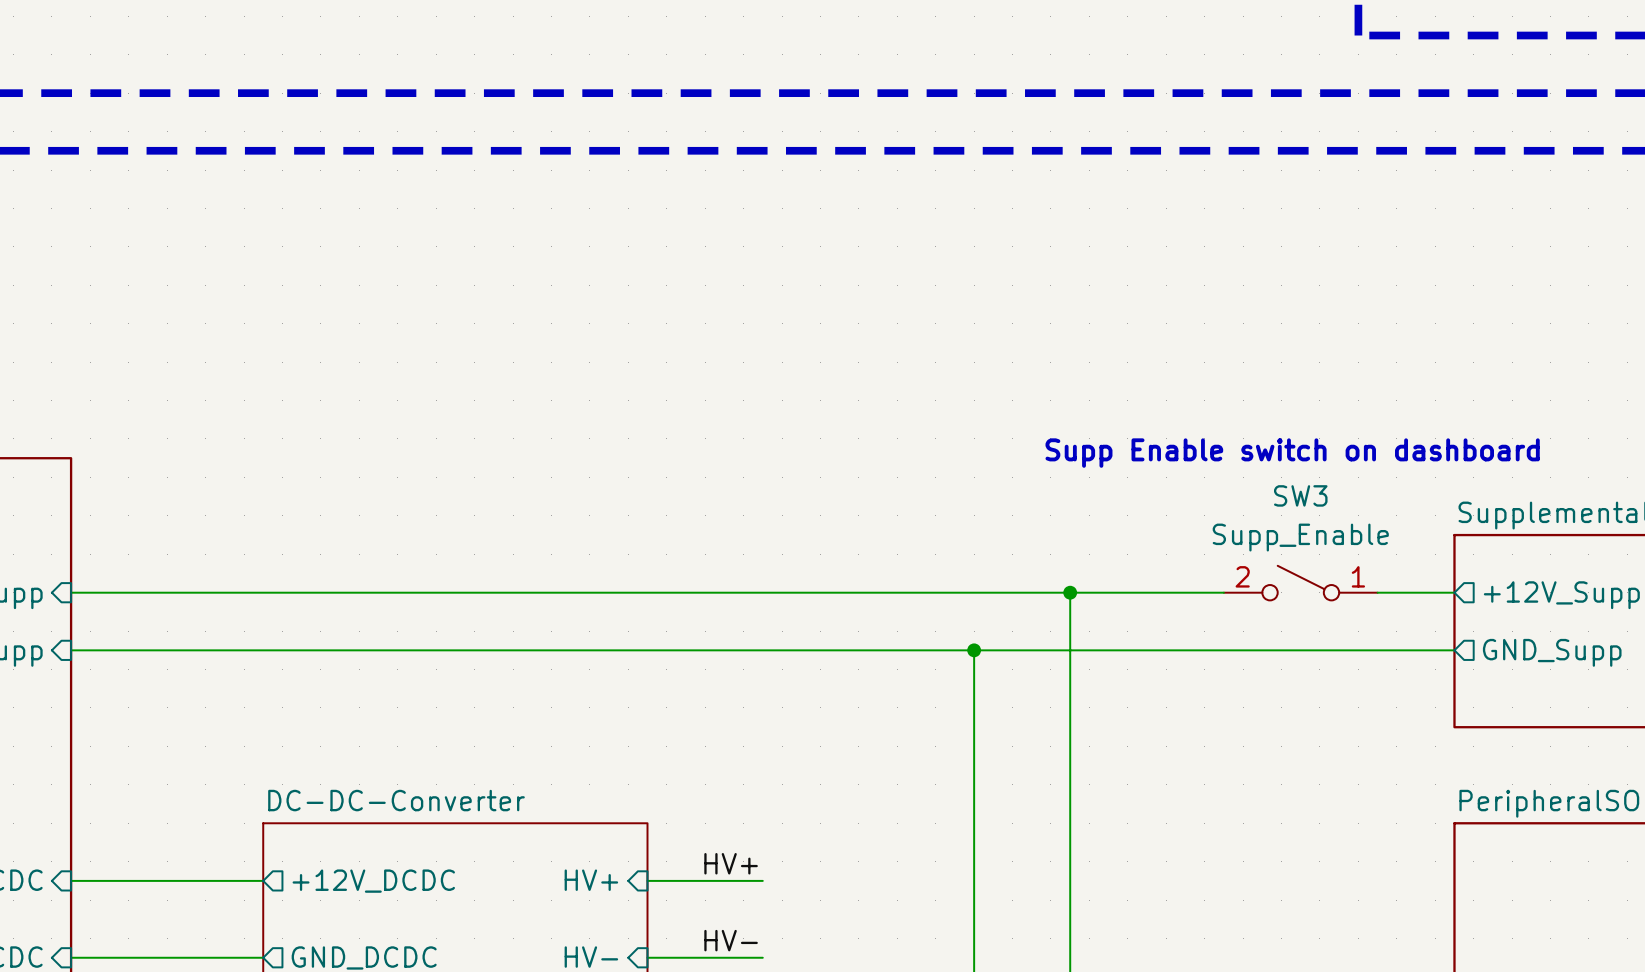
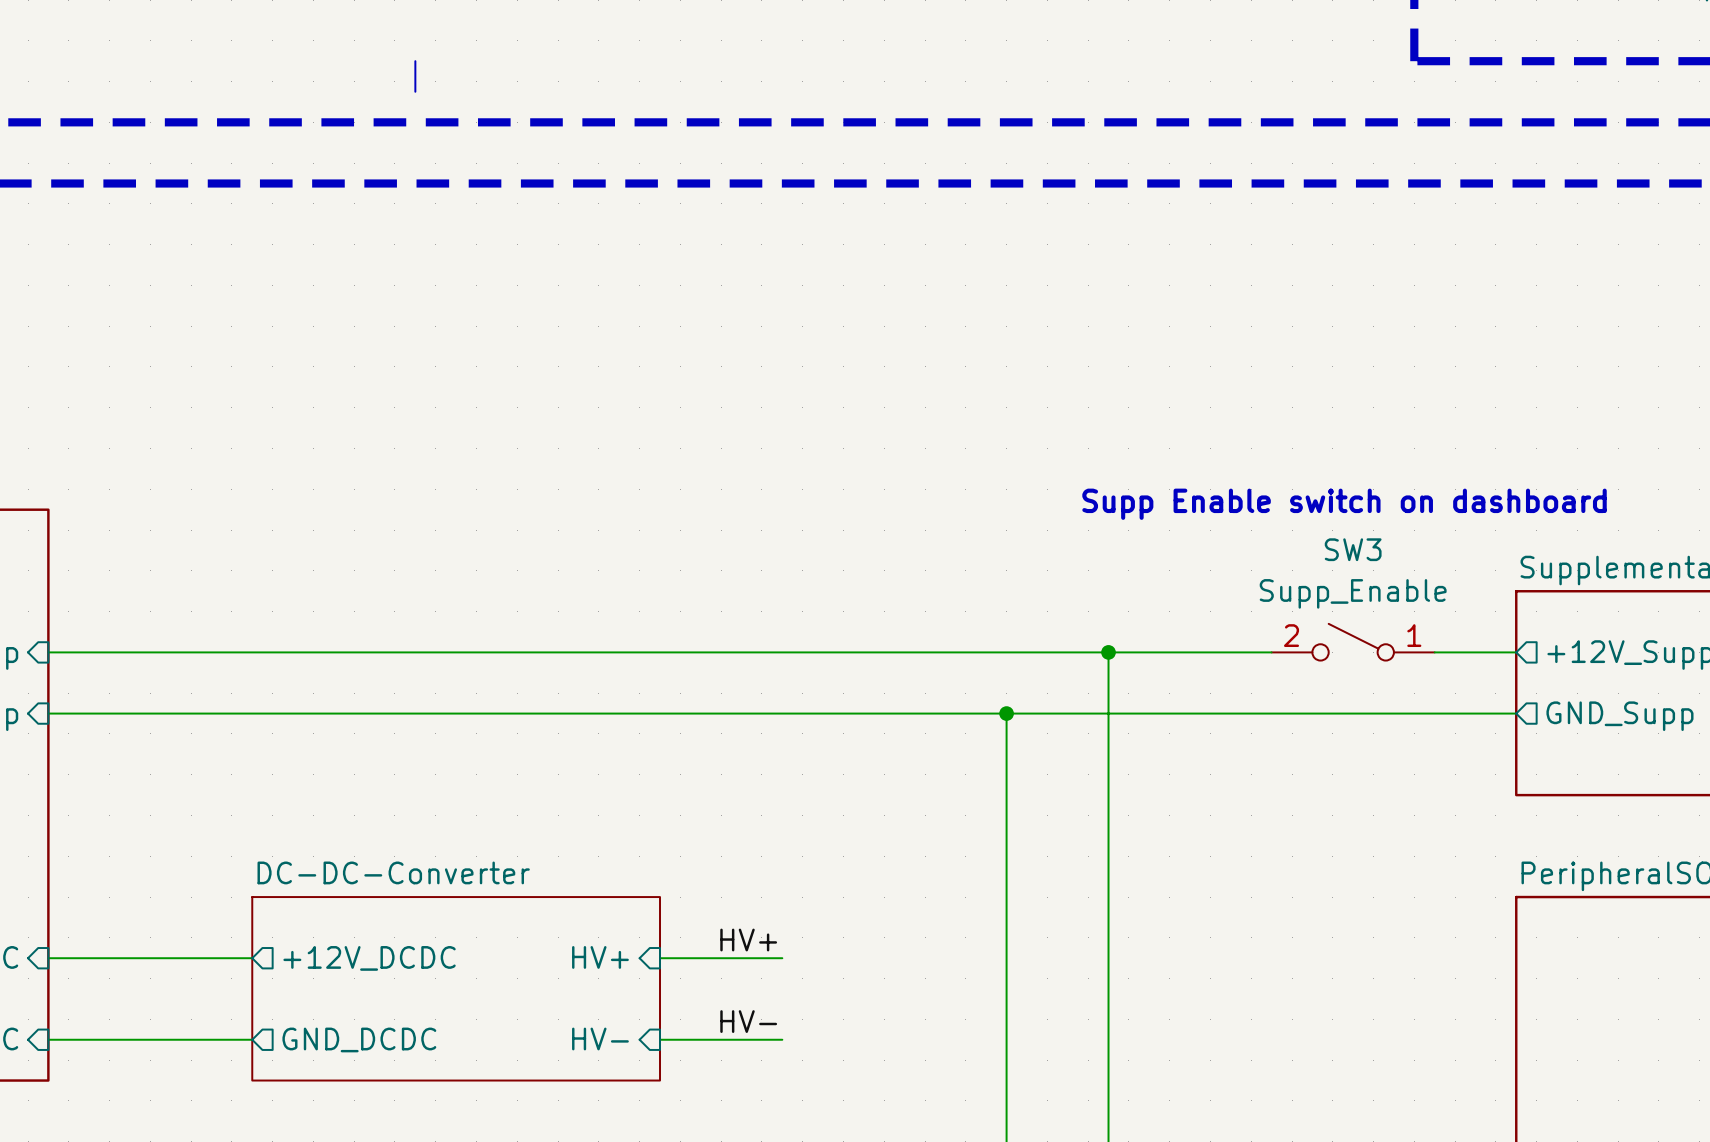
bus: none -> (415, 61) (415, 91)

